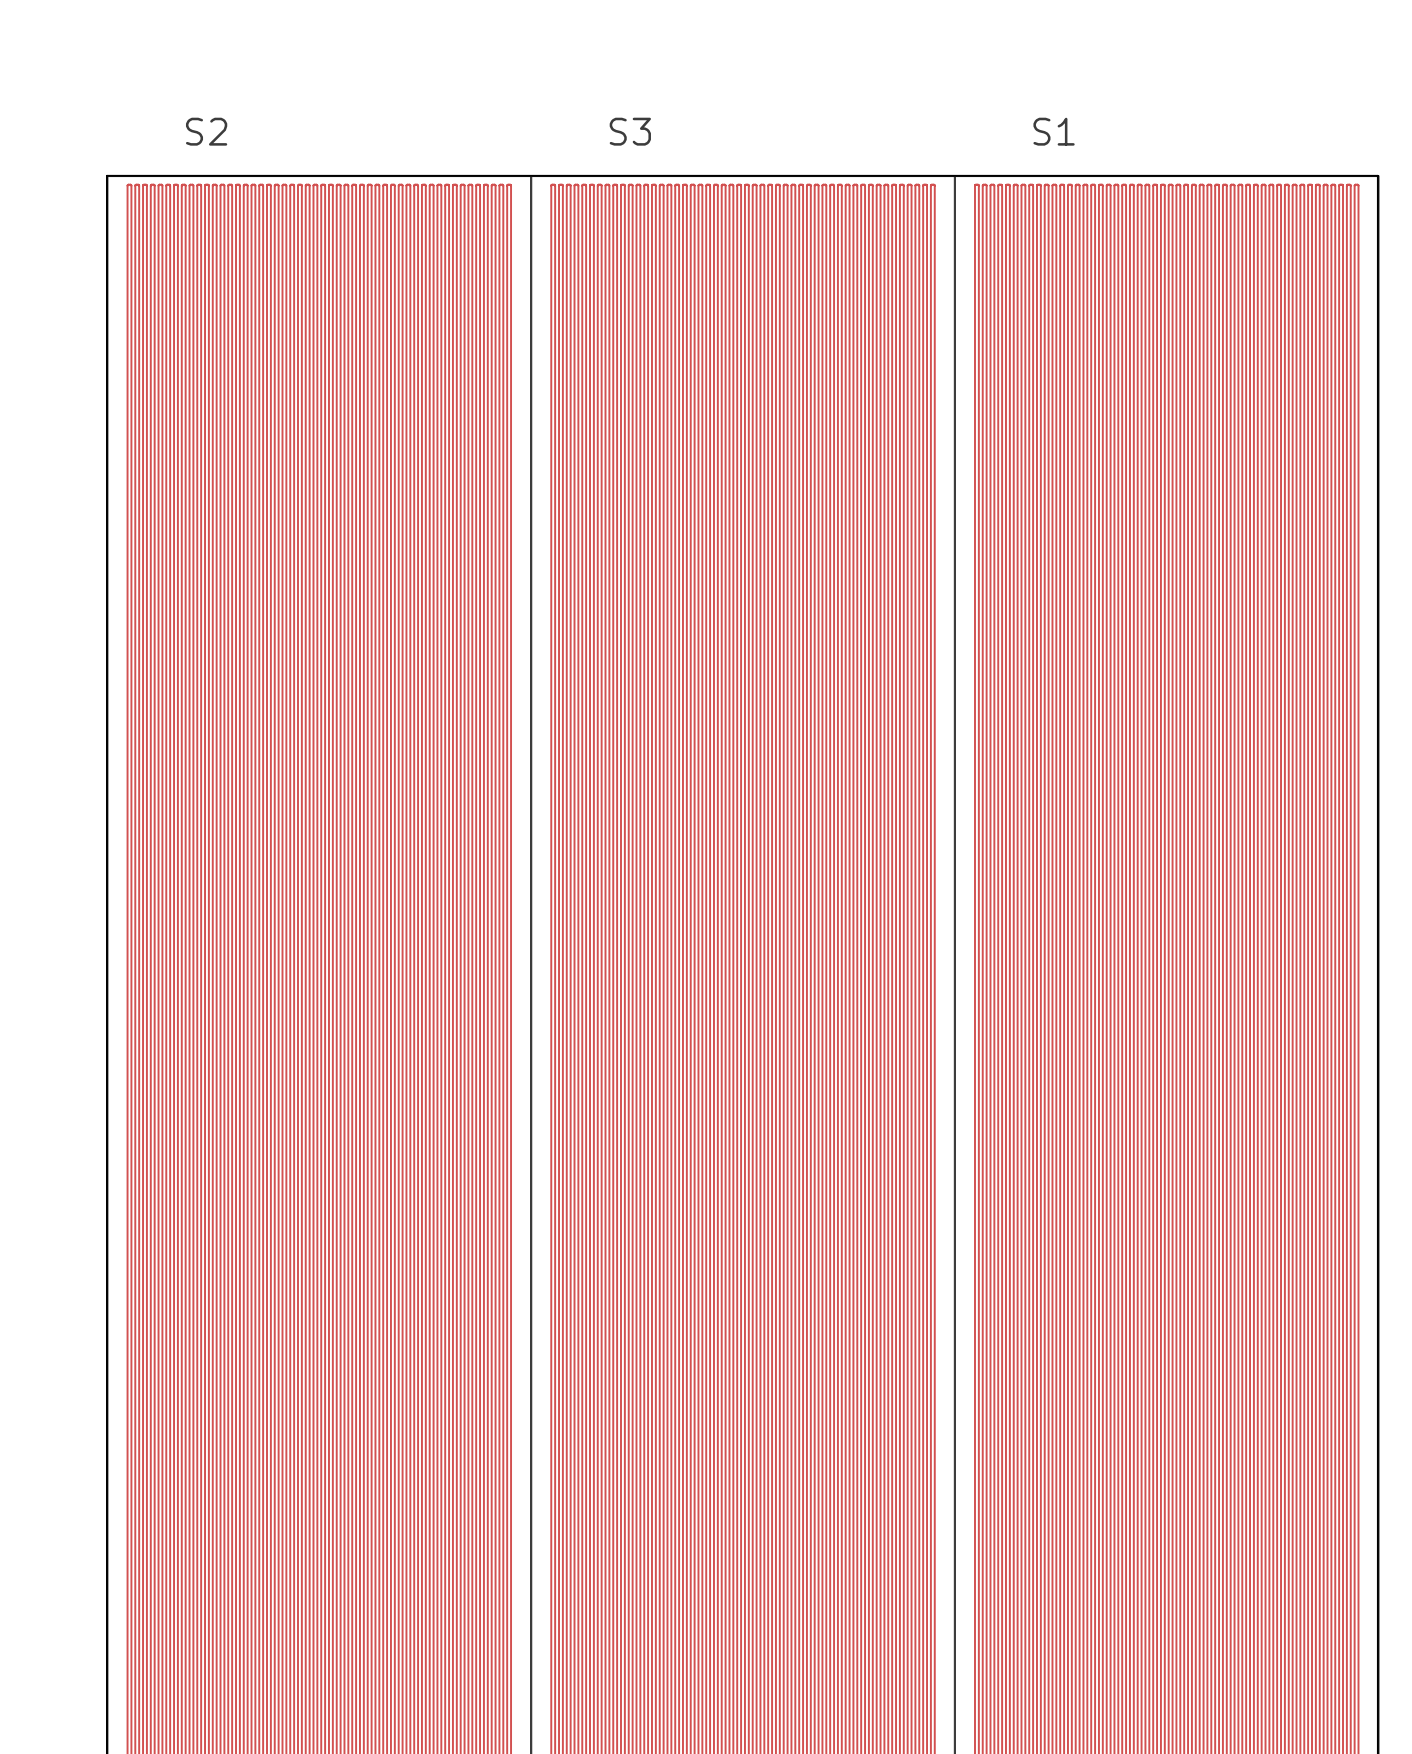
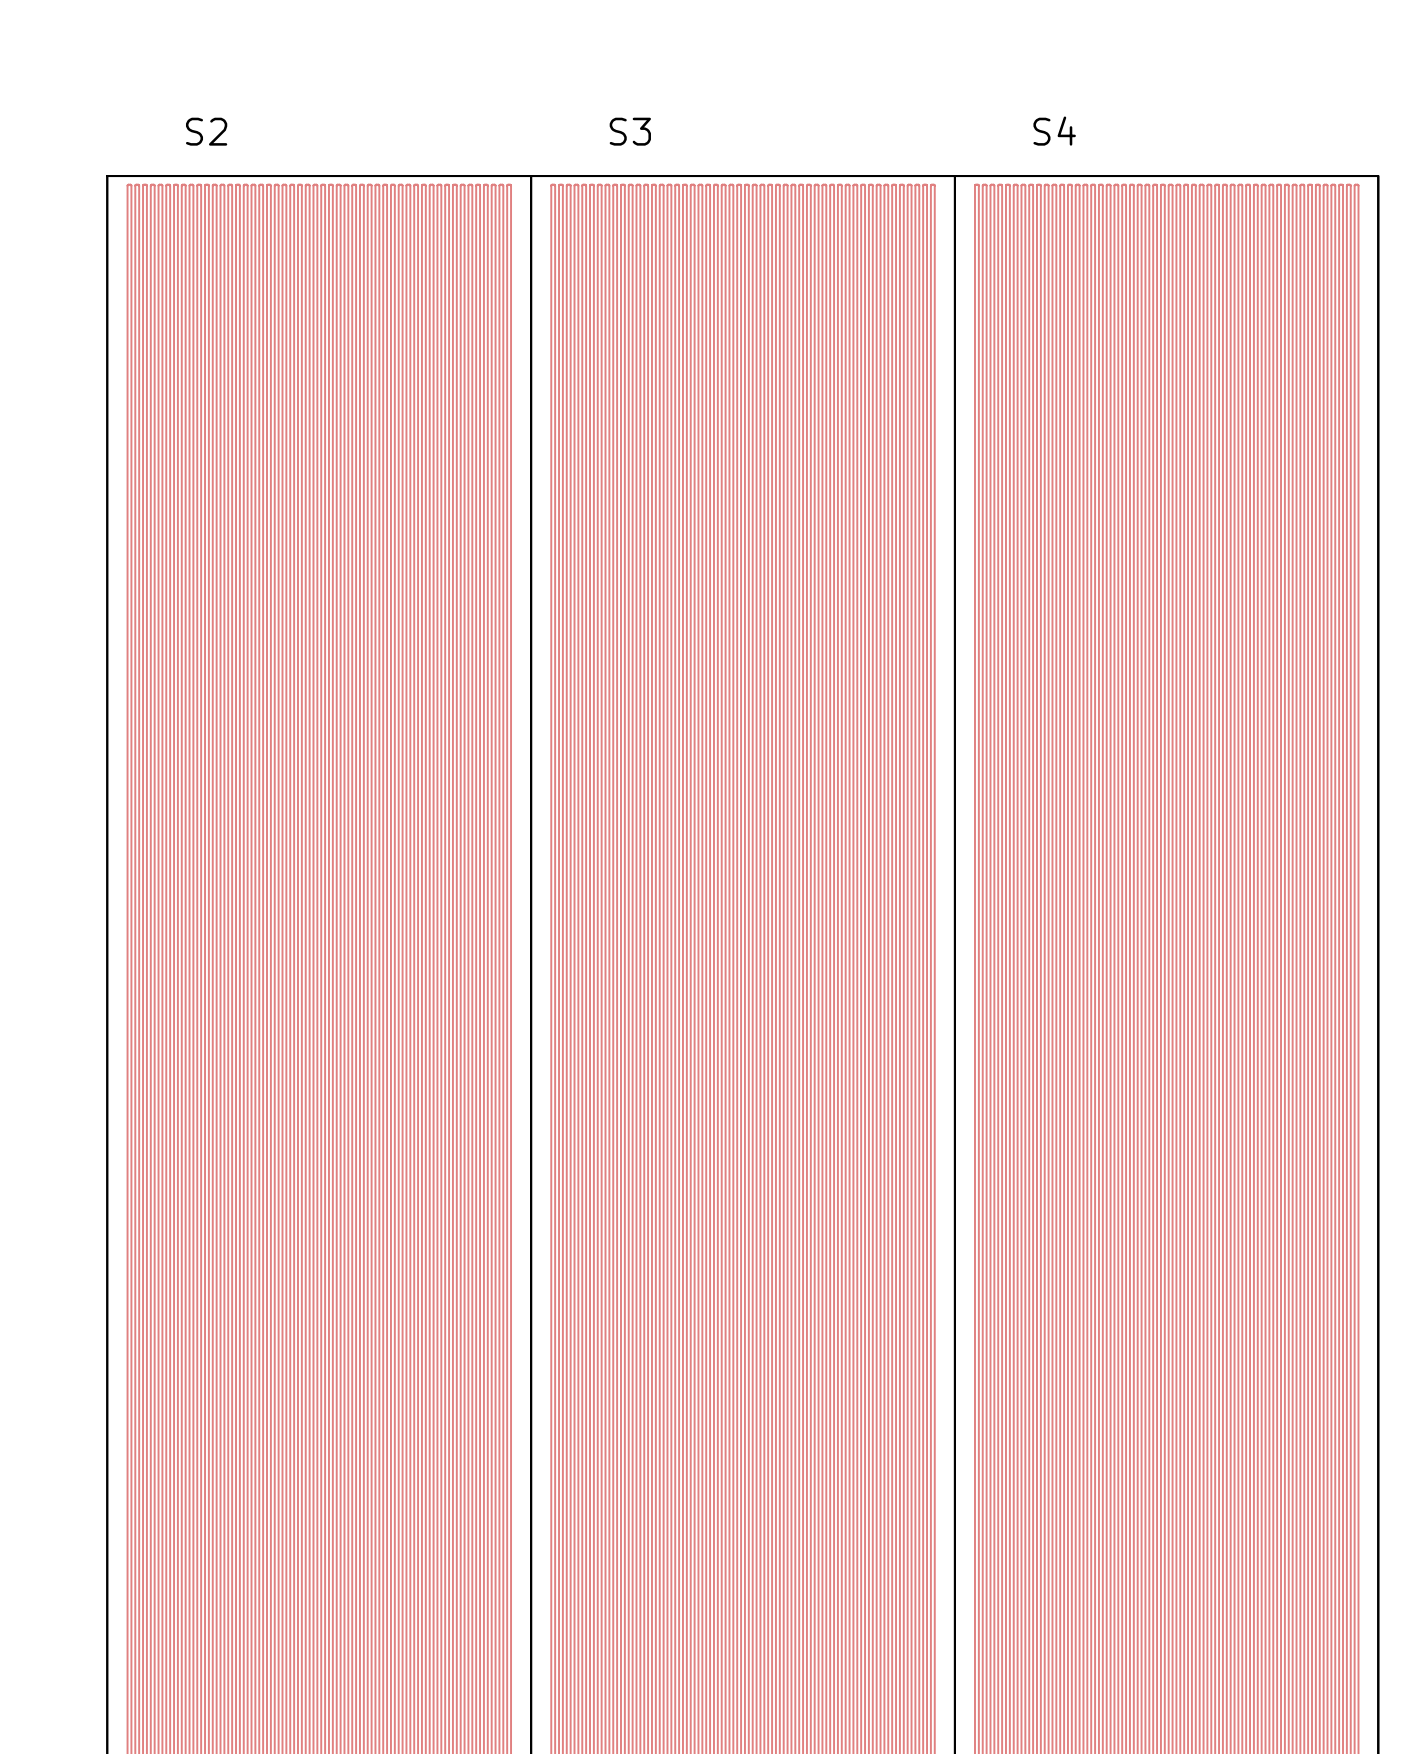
S1 name: S1 (1054, 131) -> S4 (1054, 131)

